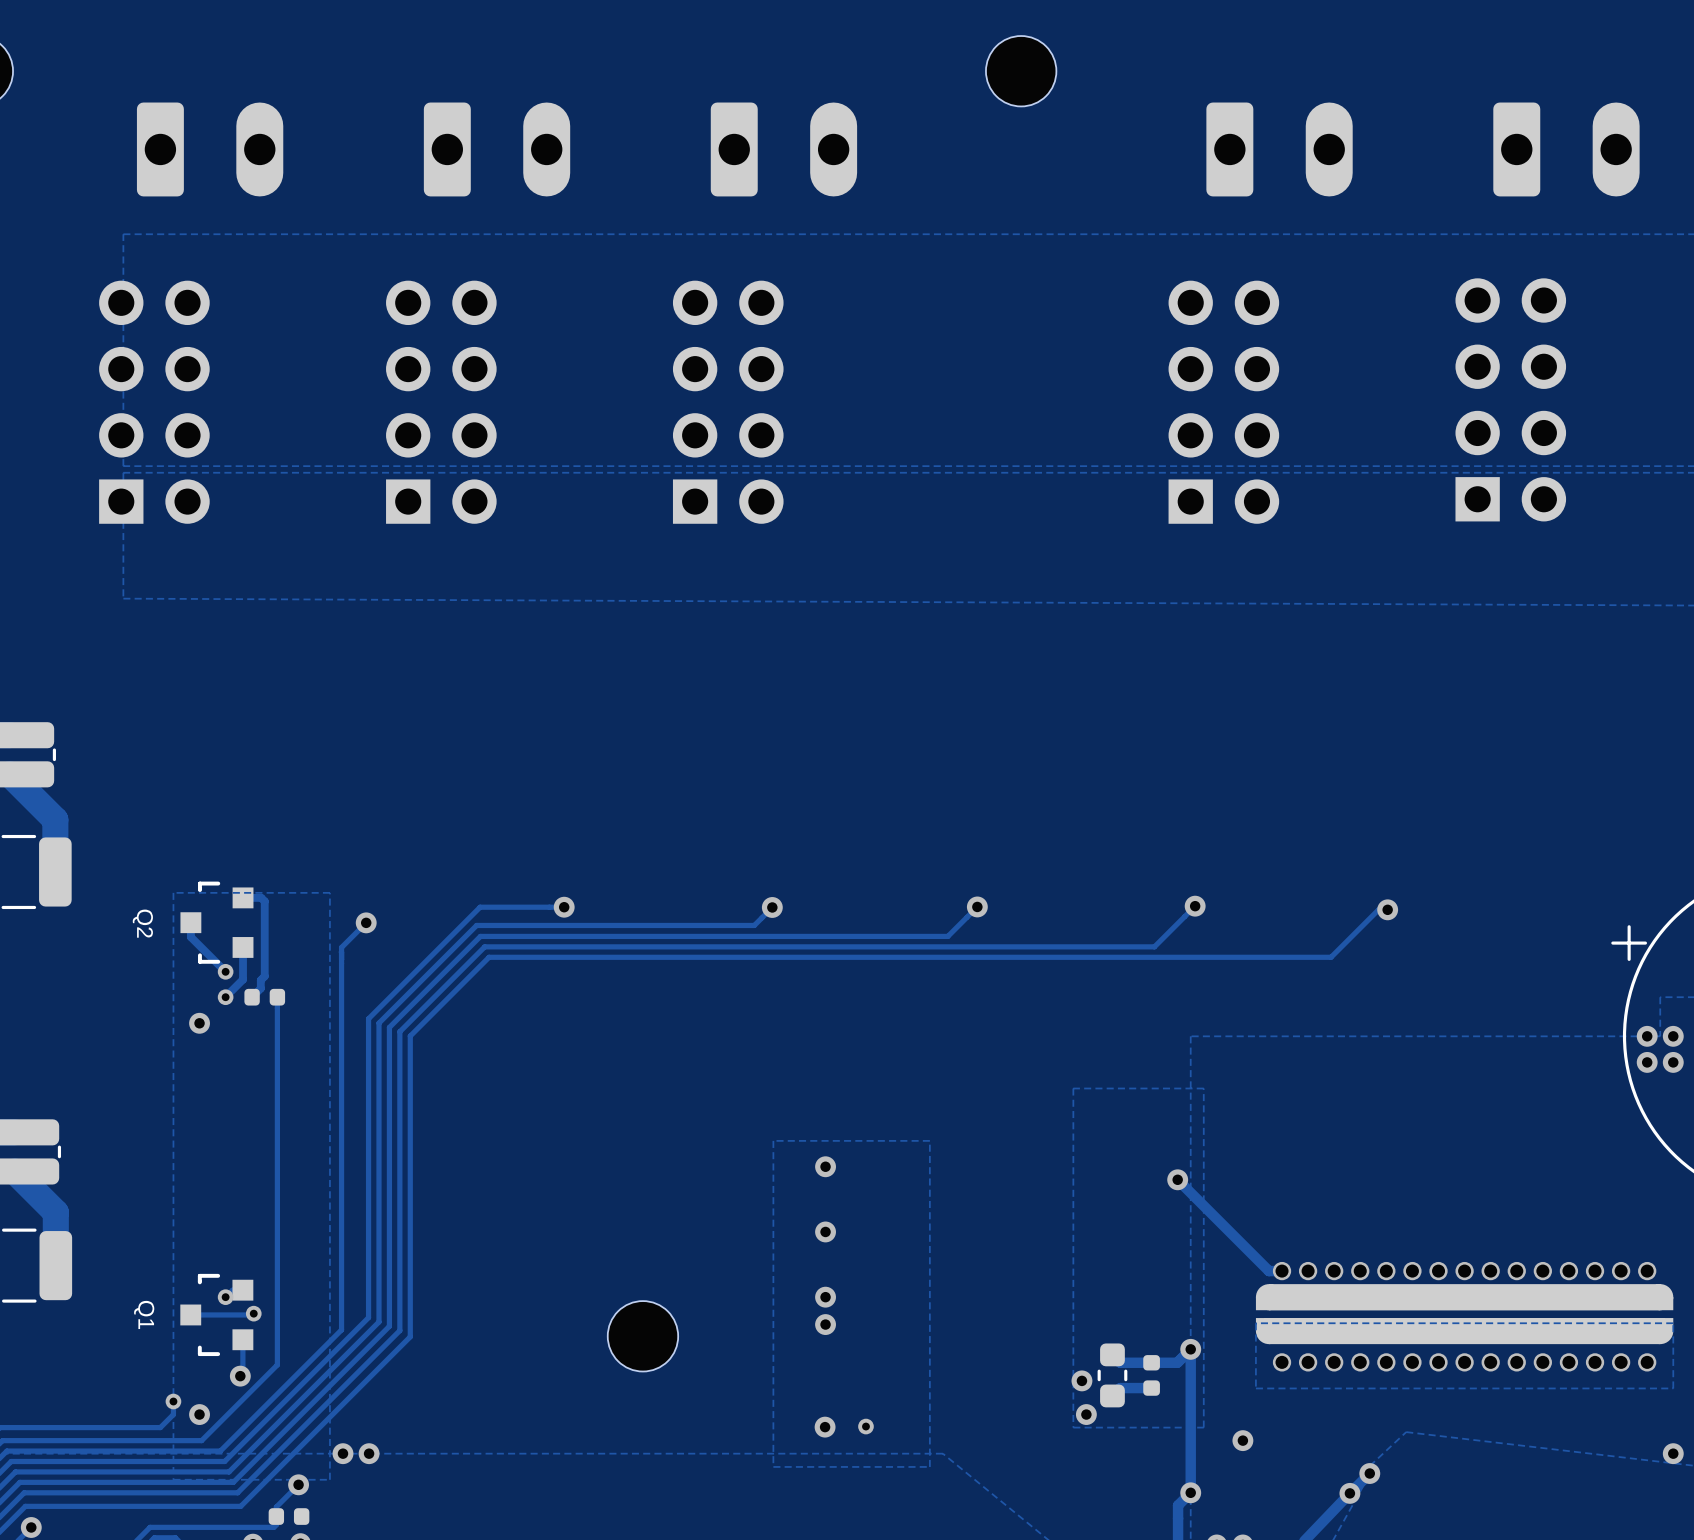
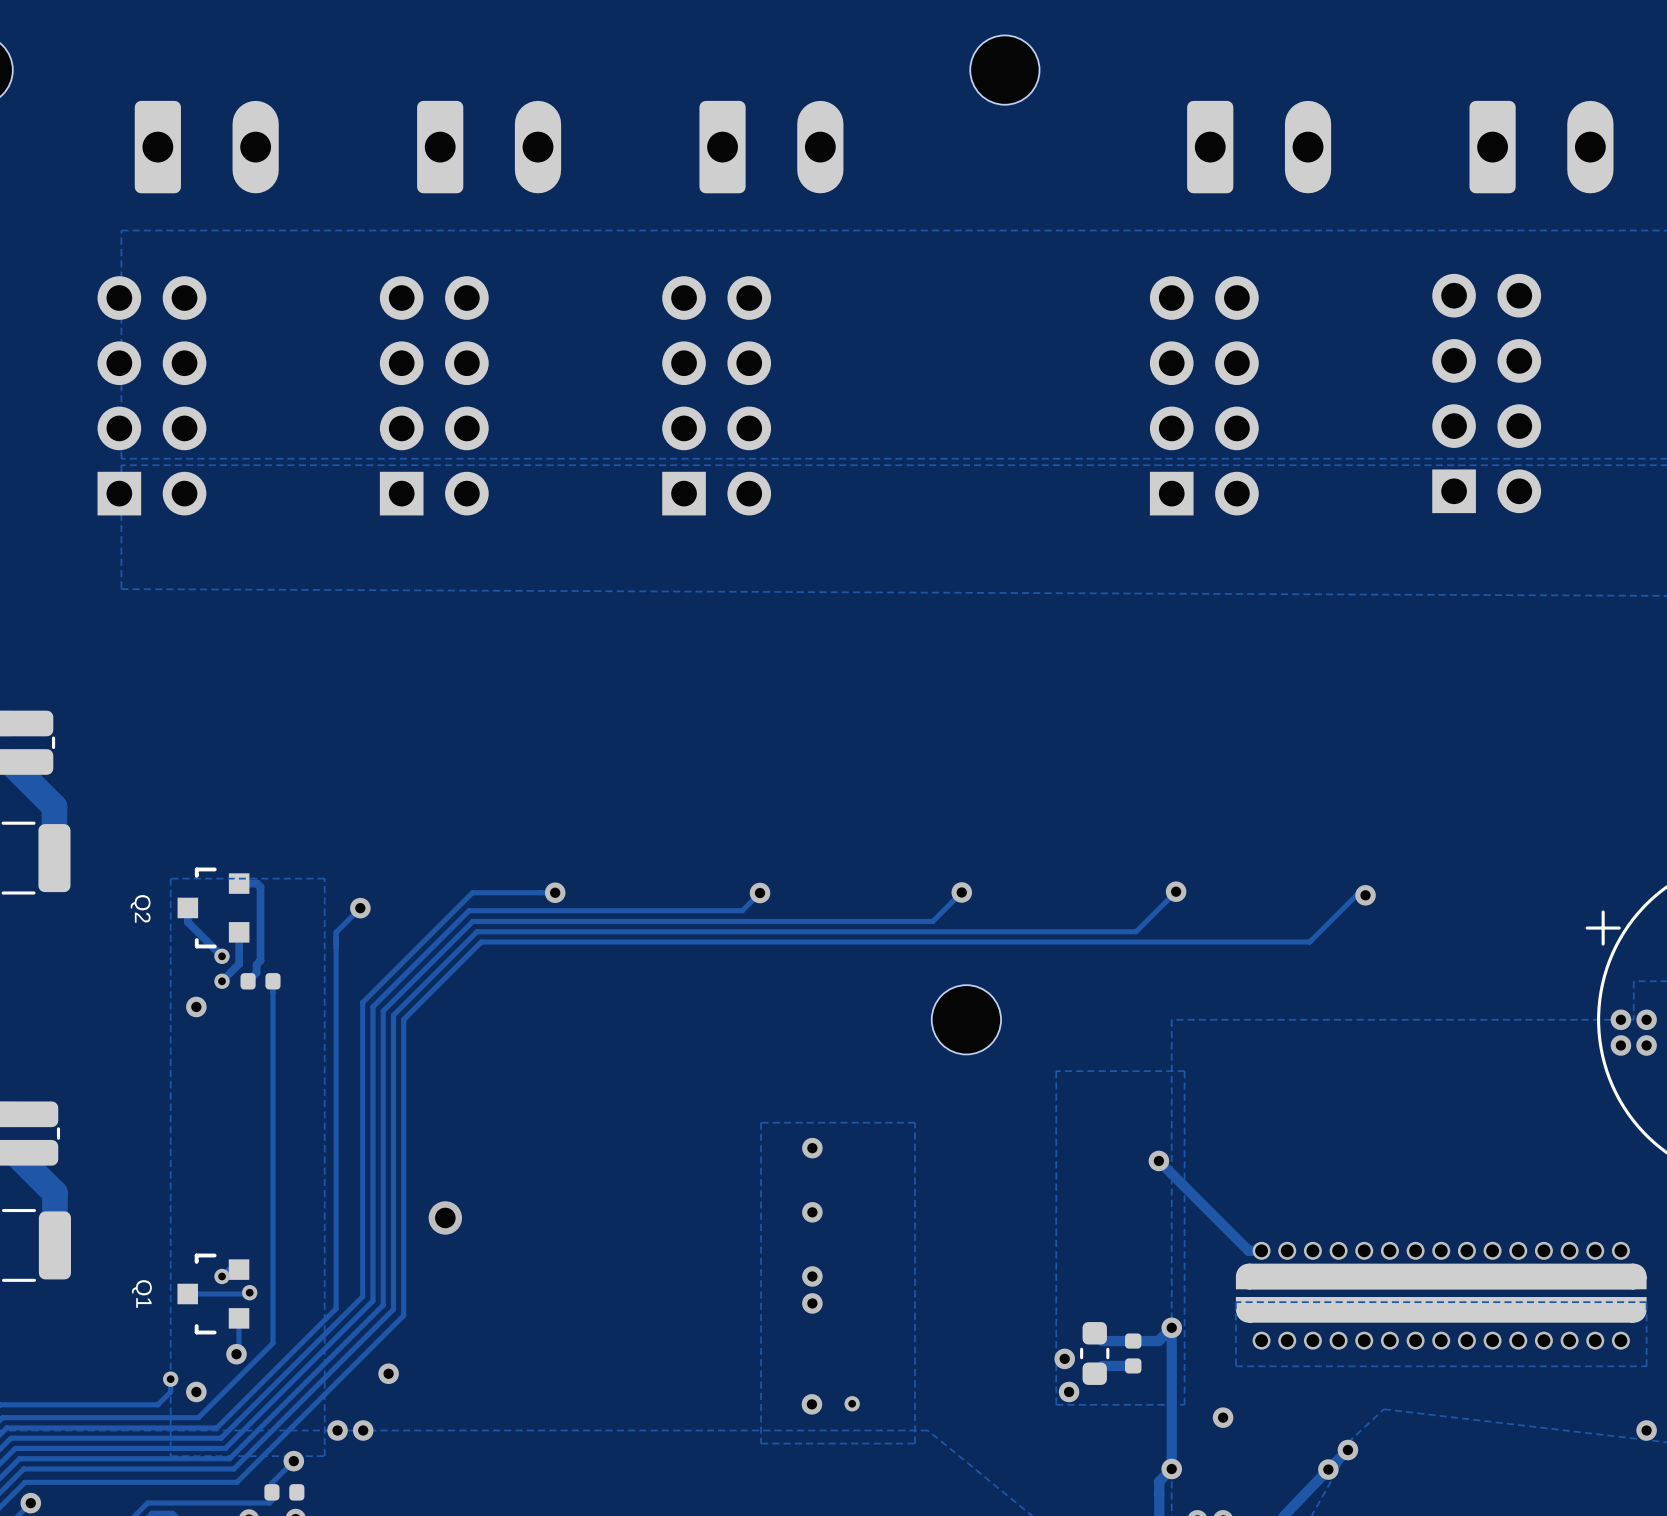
via: none -> (445, 1217)
part position: (642, 1336) -> (966, 1019)
via: none -> (388, 1373)

